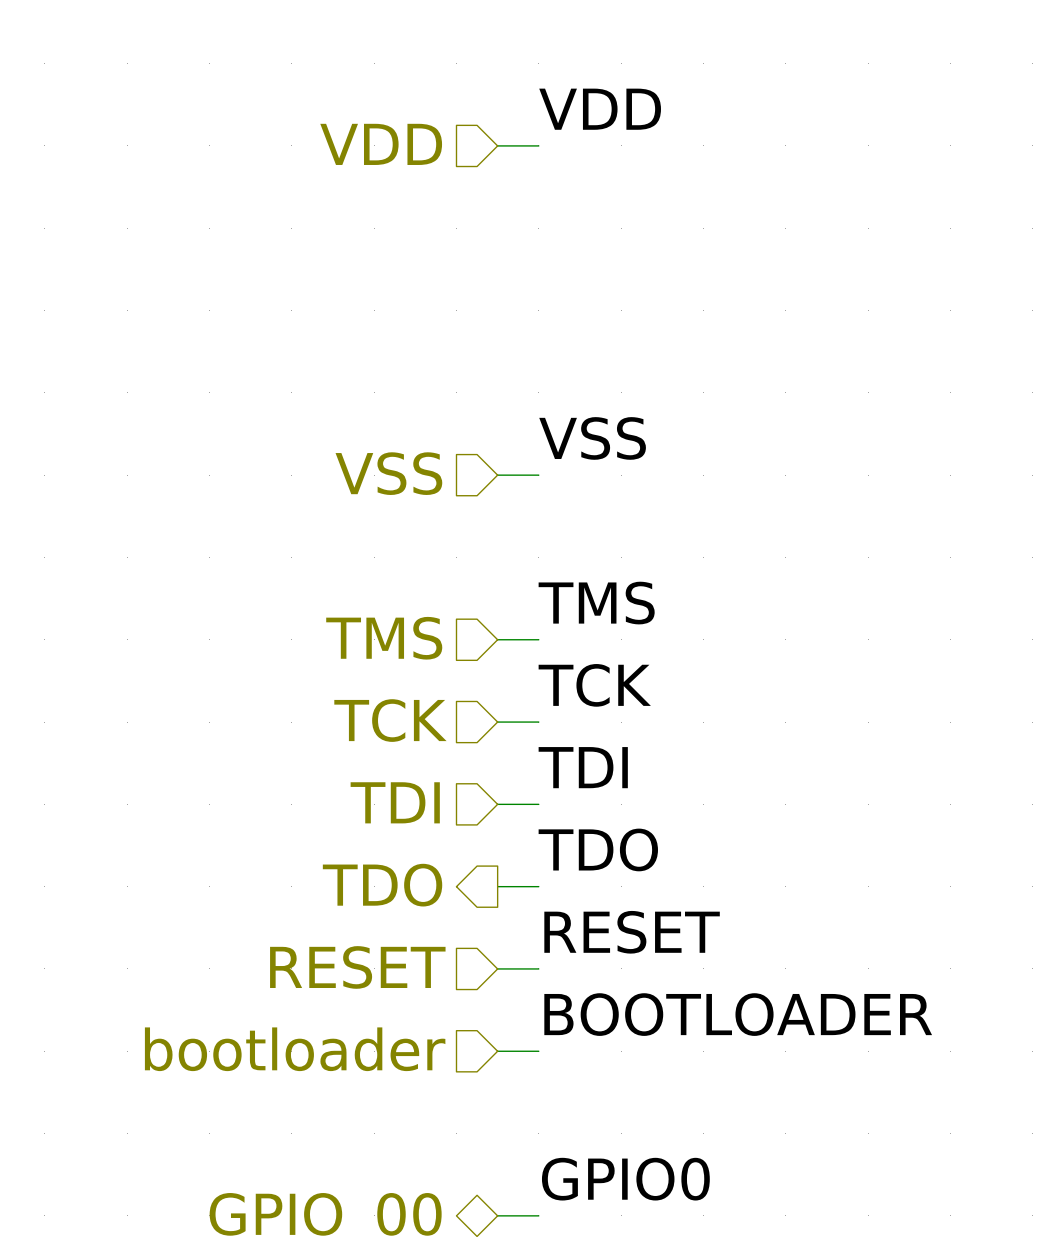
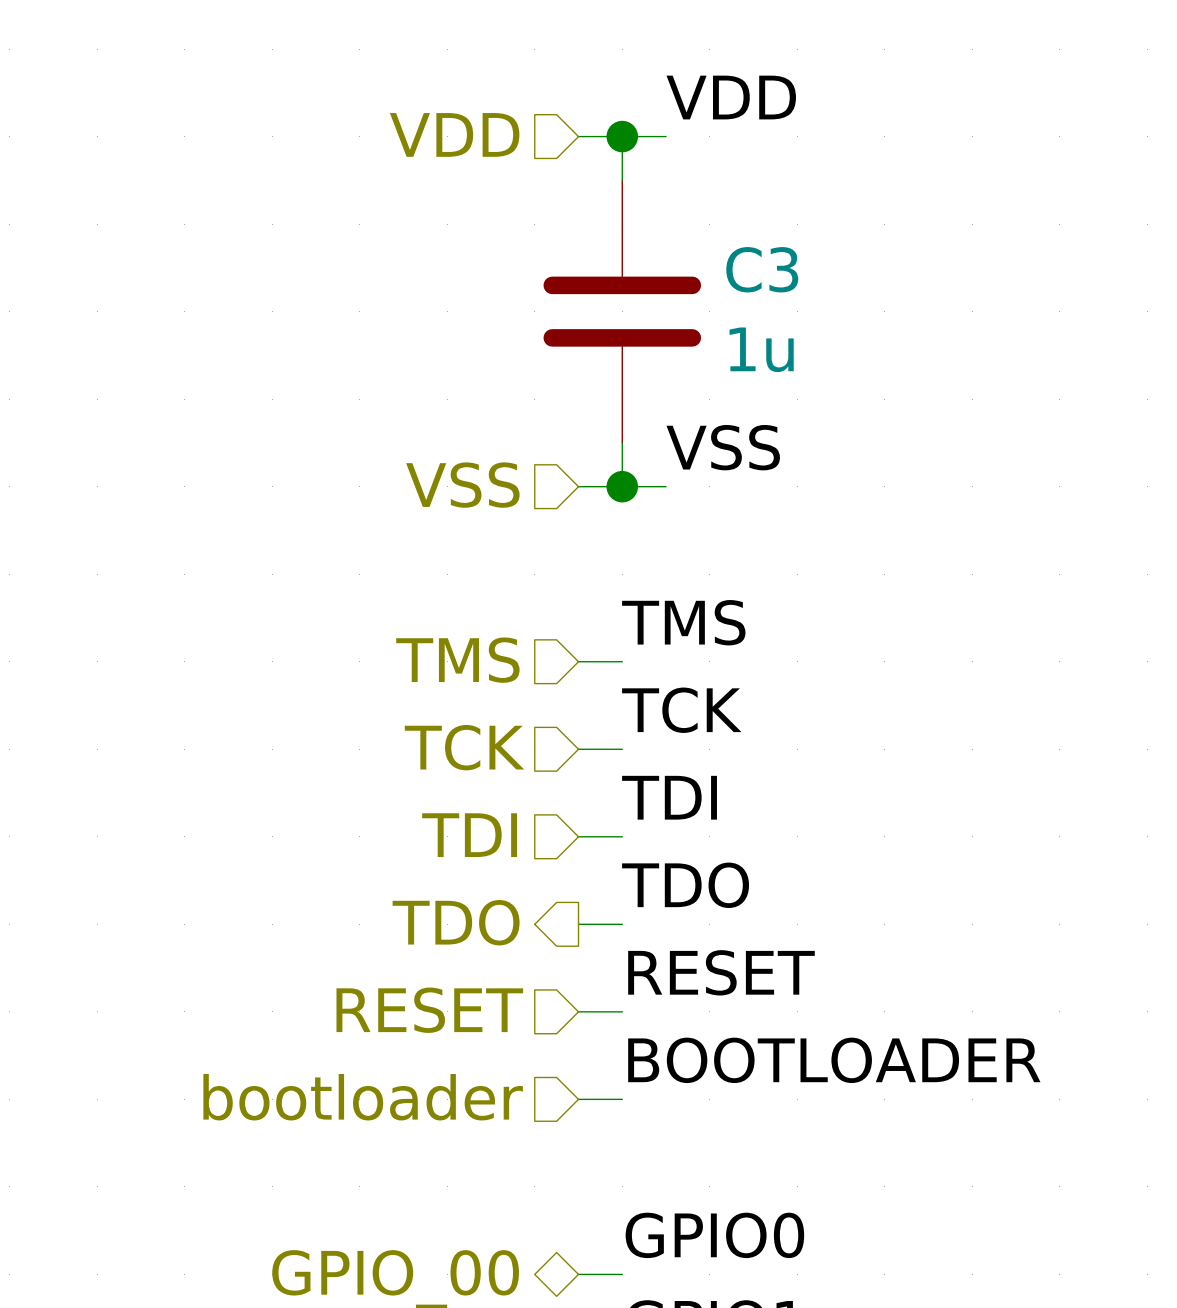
label position: VDD (600, 109) -> VDD (731, 97)
junction: none -> (622, 136)
wire: none -> (666, 136) (622, 136) (622, 180)
C3: none -> 1u (622, 311)
wire: none -> (622, 442) (622, 486) (666, 486)
label position: VSS (592, 438) -> VSS (723, 447)
junction: none -> (622, 486)

